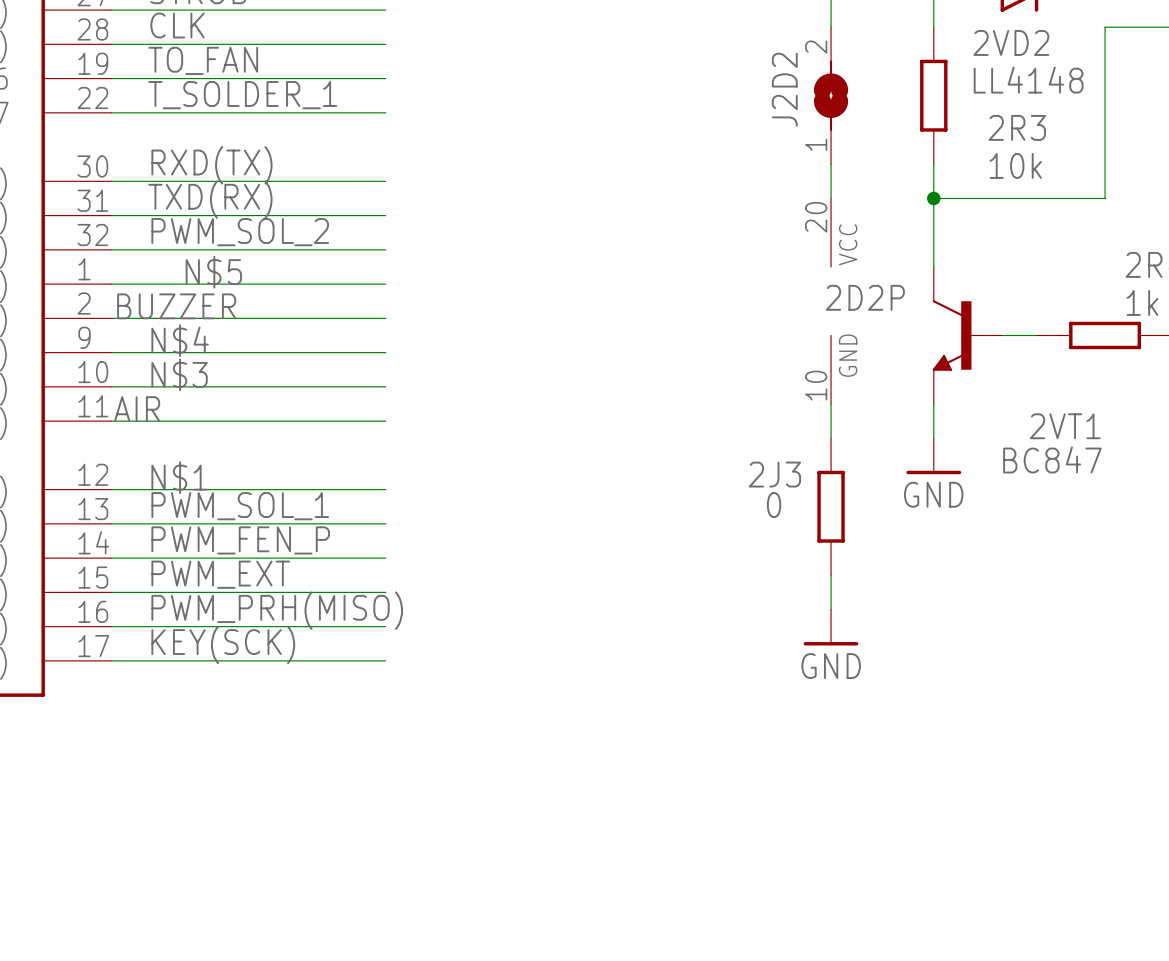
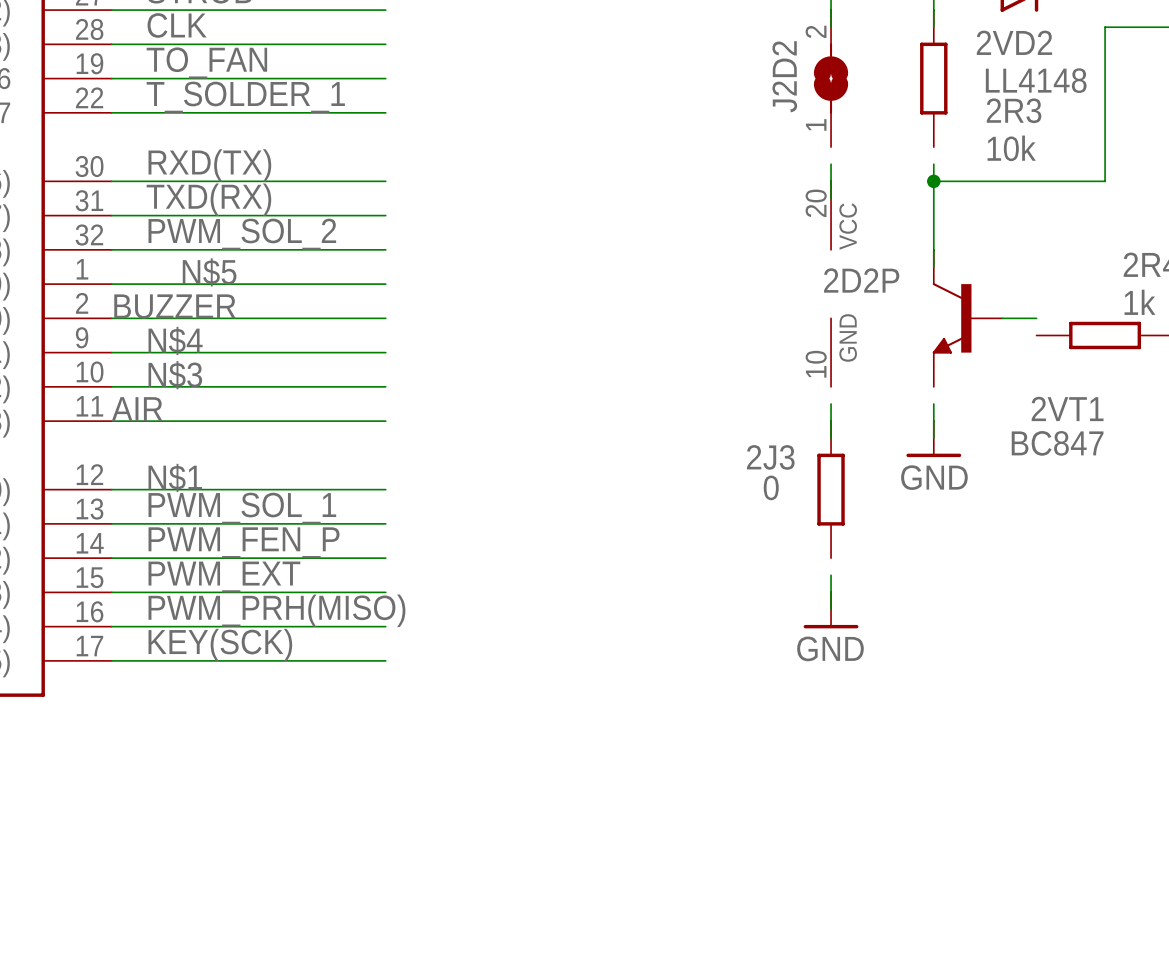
J2D2 position: (831, 95) -> (831, 78)
2R3 position: (933, 95) -> (933, 78)
wire: (1105, 181) (1105, 198) (933, 198) -> (1105, 181) (933, 181)
junction position: (933, 198) -> (933, 181)
2D2P position: (831, 301) -> (831, 284)
2VT1 position: (967, 335) -> (967, 318)
wire: (1002, 335) (1036, 335) -> (1002, 318) (1036, 318)
power symbol position: GND (933, 456) -> GND (933, 439)
2J3 position: (831, 506) -> (831, 489)
power symbol position: GND (831, 627) -> GND (831, 610)

